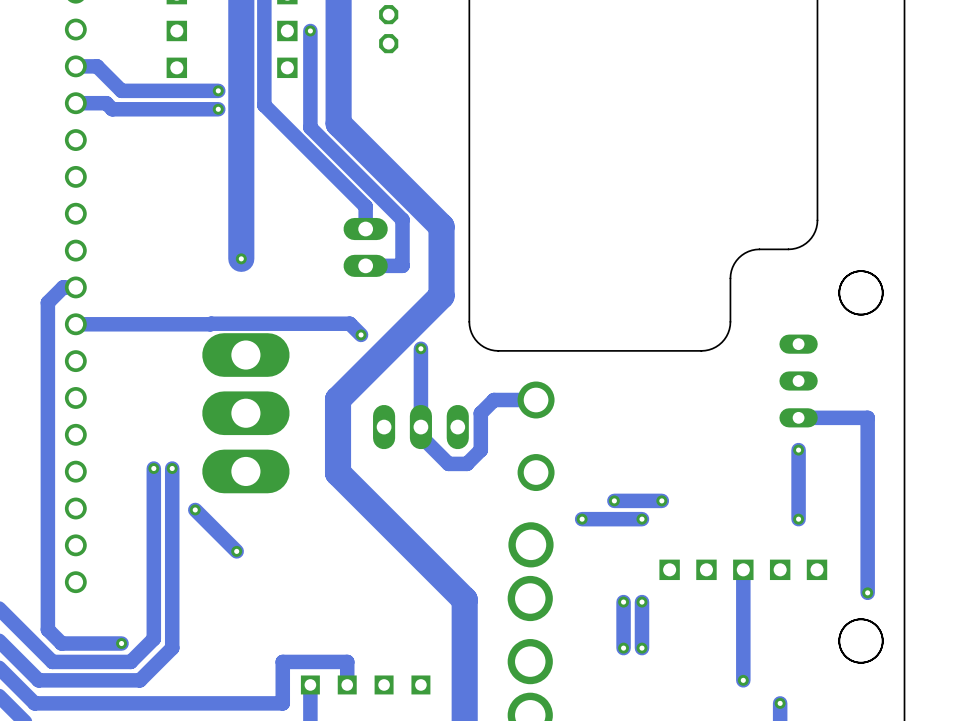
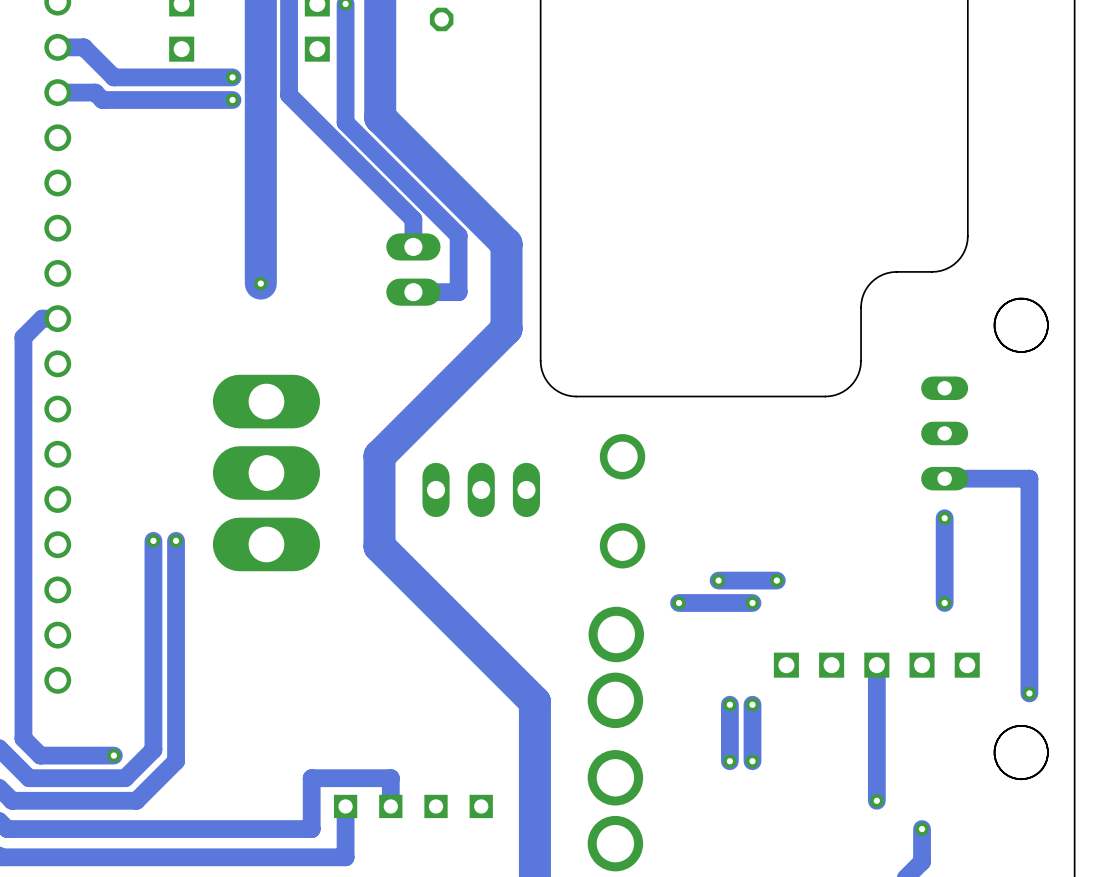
track: (75, 324) (349, 323) (361, 334) -> none
via: (361, 334) -> none
track: (420, 348) (420, 436) (448, 463) (466, 463) (480, 450) (480, 413) (494, 400) (536, 400) -> none
via: (420, 348) -> none
track: (195, 509) (236, 551) -> none
via: (195, 509) -> none
via: (236, 551) -> none

